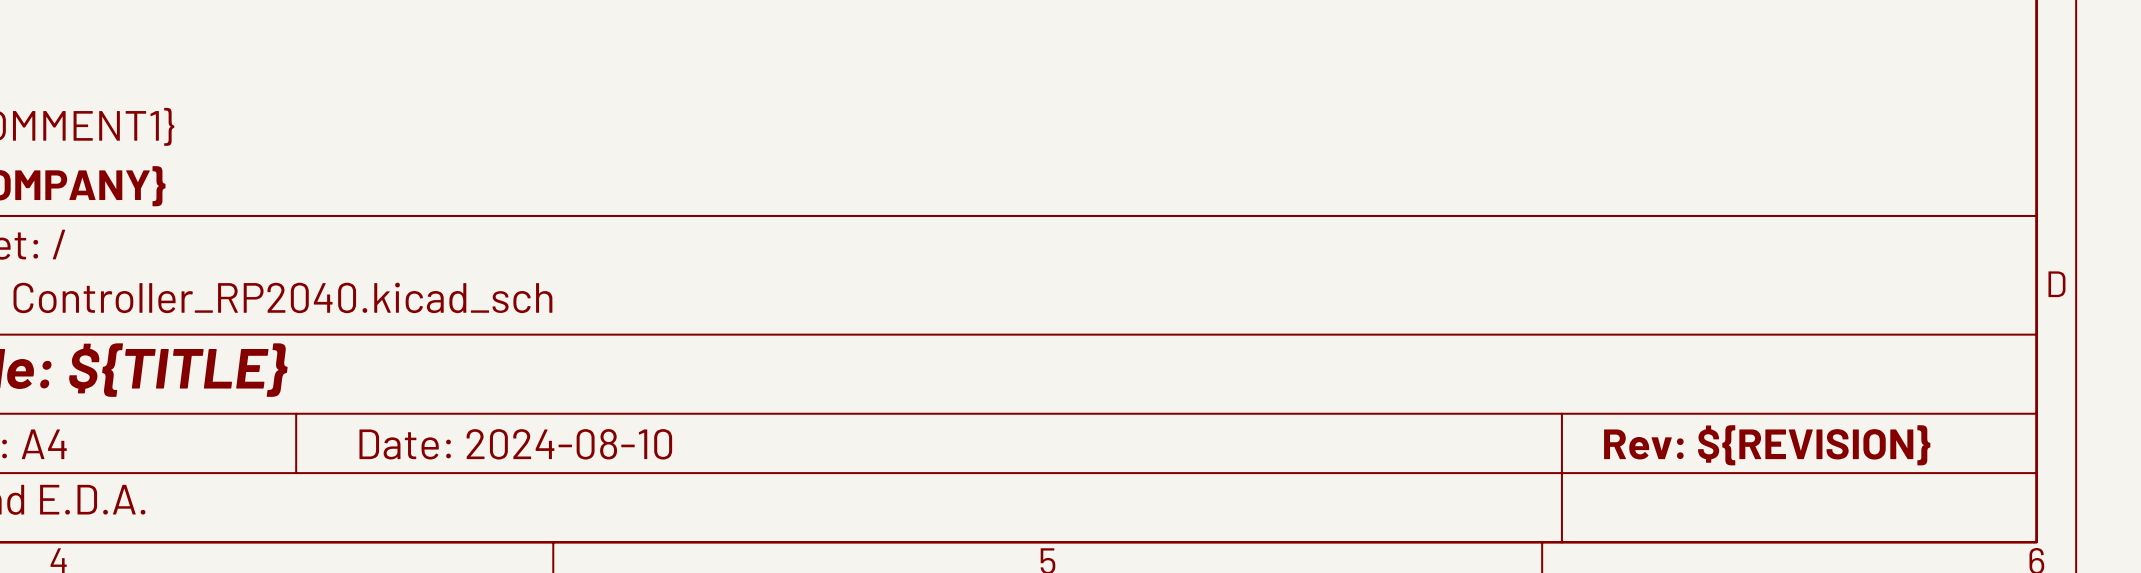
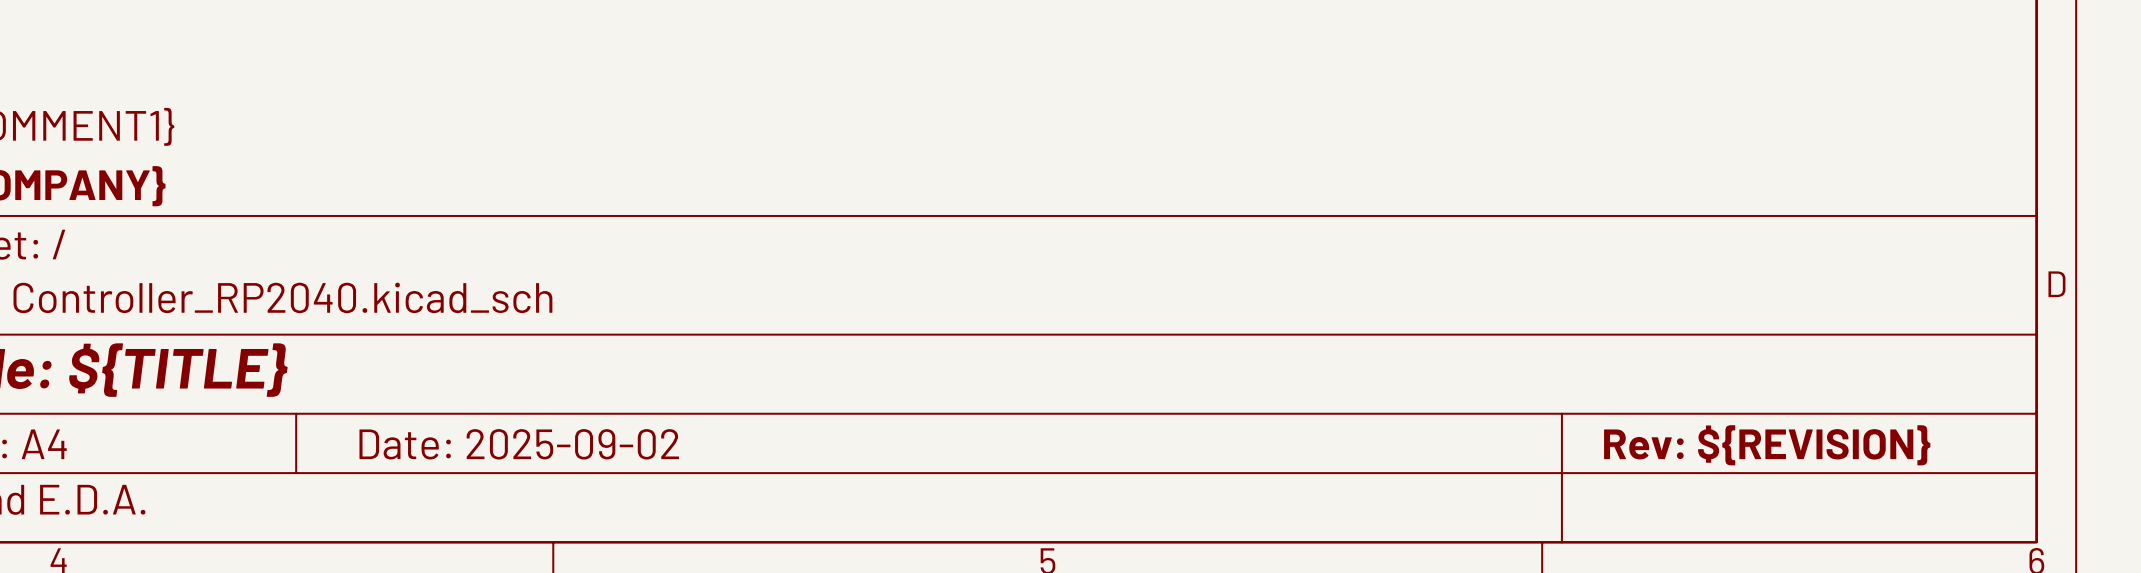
title block: Date: 2024-08-10 (515, 444) -> Date: 2025-09-02 (519, 444)

